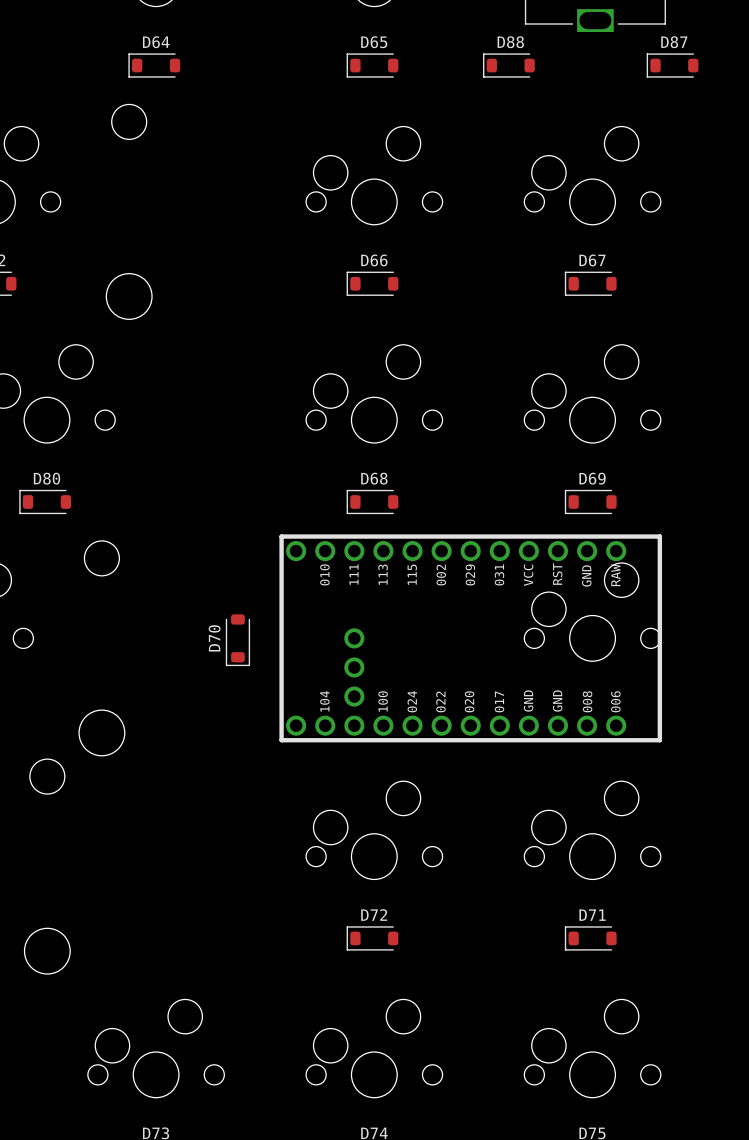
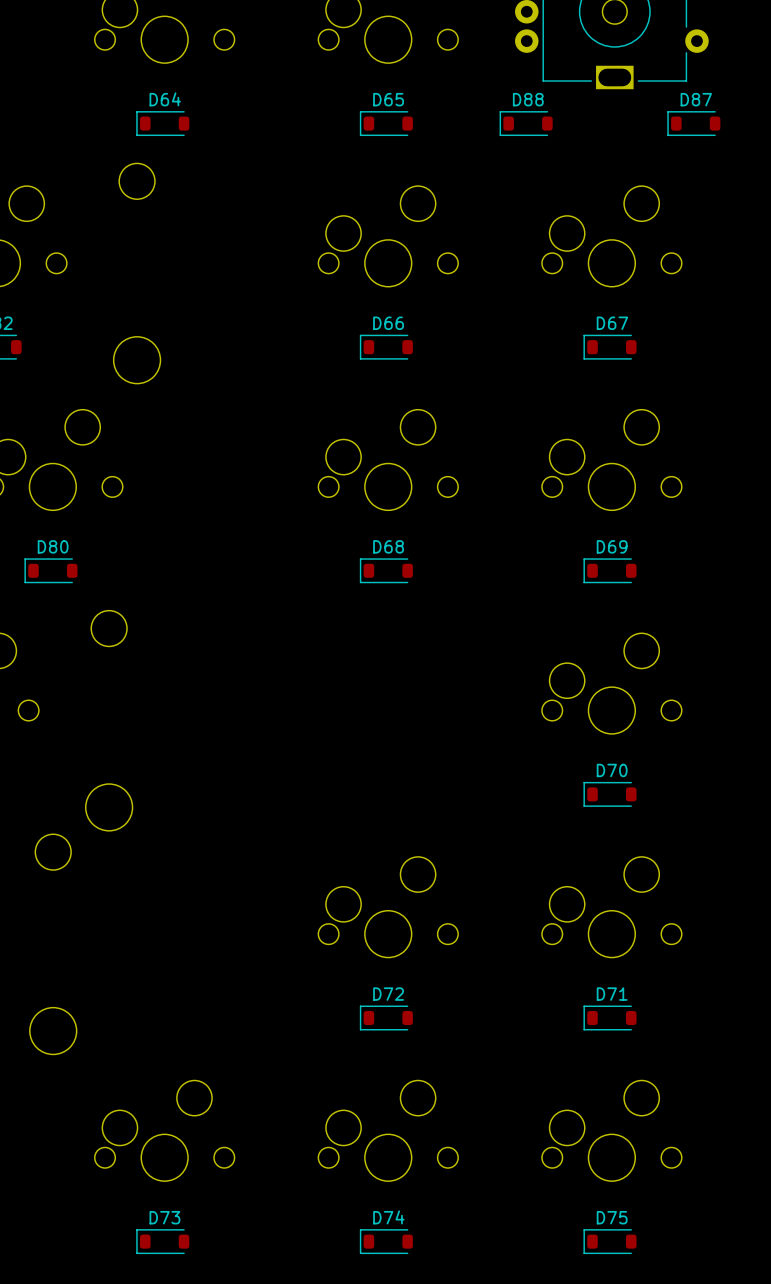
part: (470, 638) -> none
D70 rotation: 0° (237, 640) -> 90° clockwise (610, 794)
D70 position: (237, 640) -> (610, 794)

